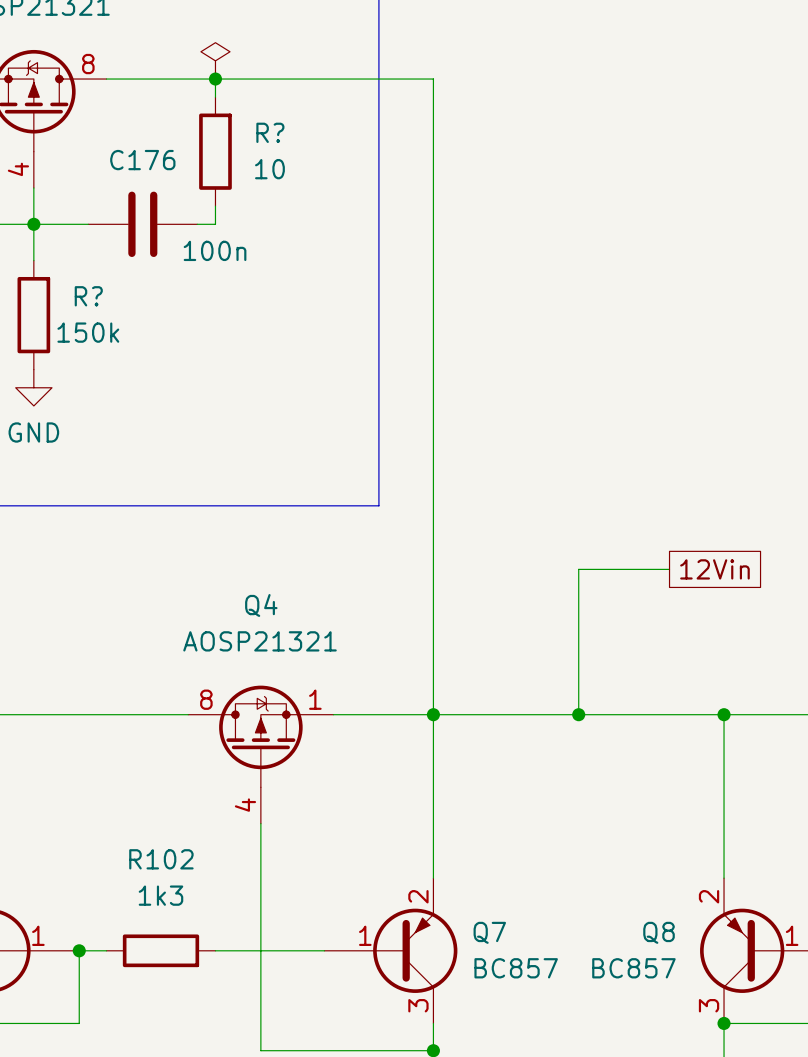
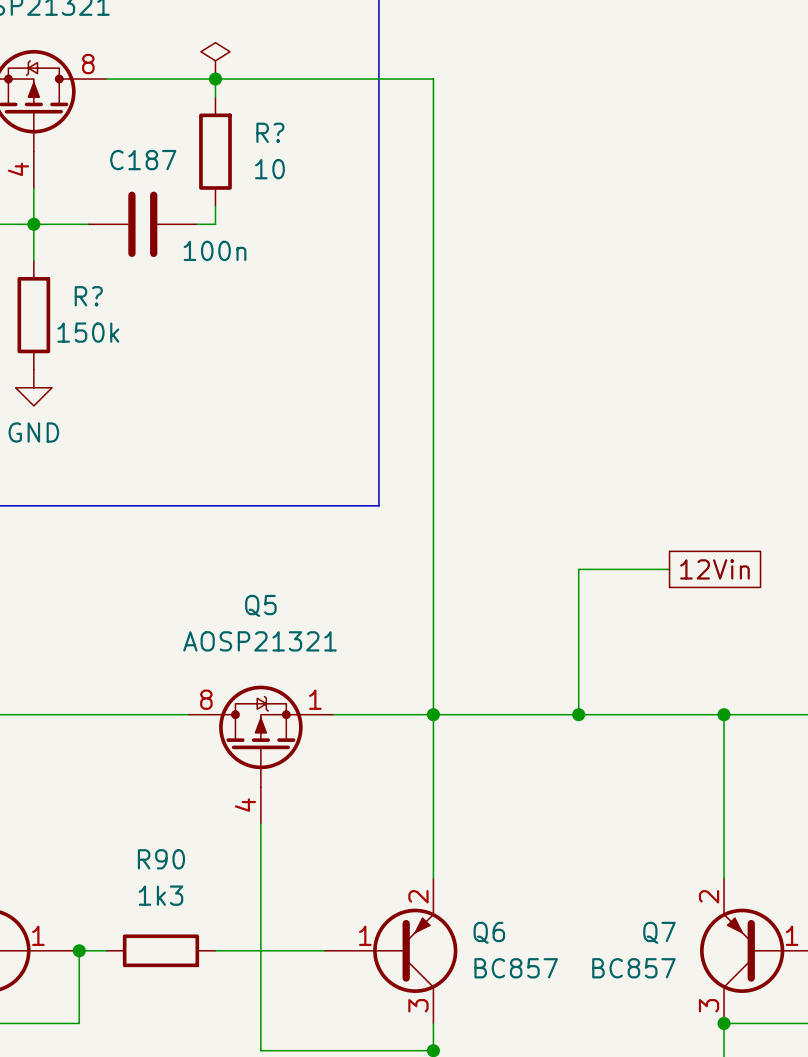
C176 name: C176 (142, 160) -> C187 (143, 160)
Q4 name: Q4 (261, 605) -> Q5 (260, 605)
R102 name: R102 (161, 859) -> R90 (161, 859)
Q7 name: Q7 (489, 932) -> Q6 (489, 932)
Q8 name: Q8 (659, 932) -> Q7 (659, 932)

